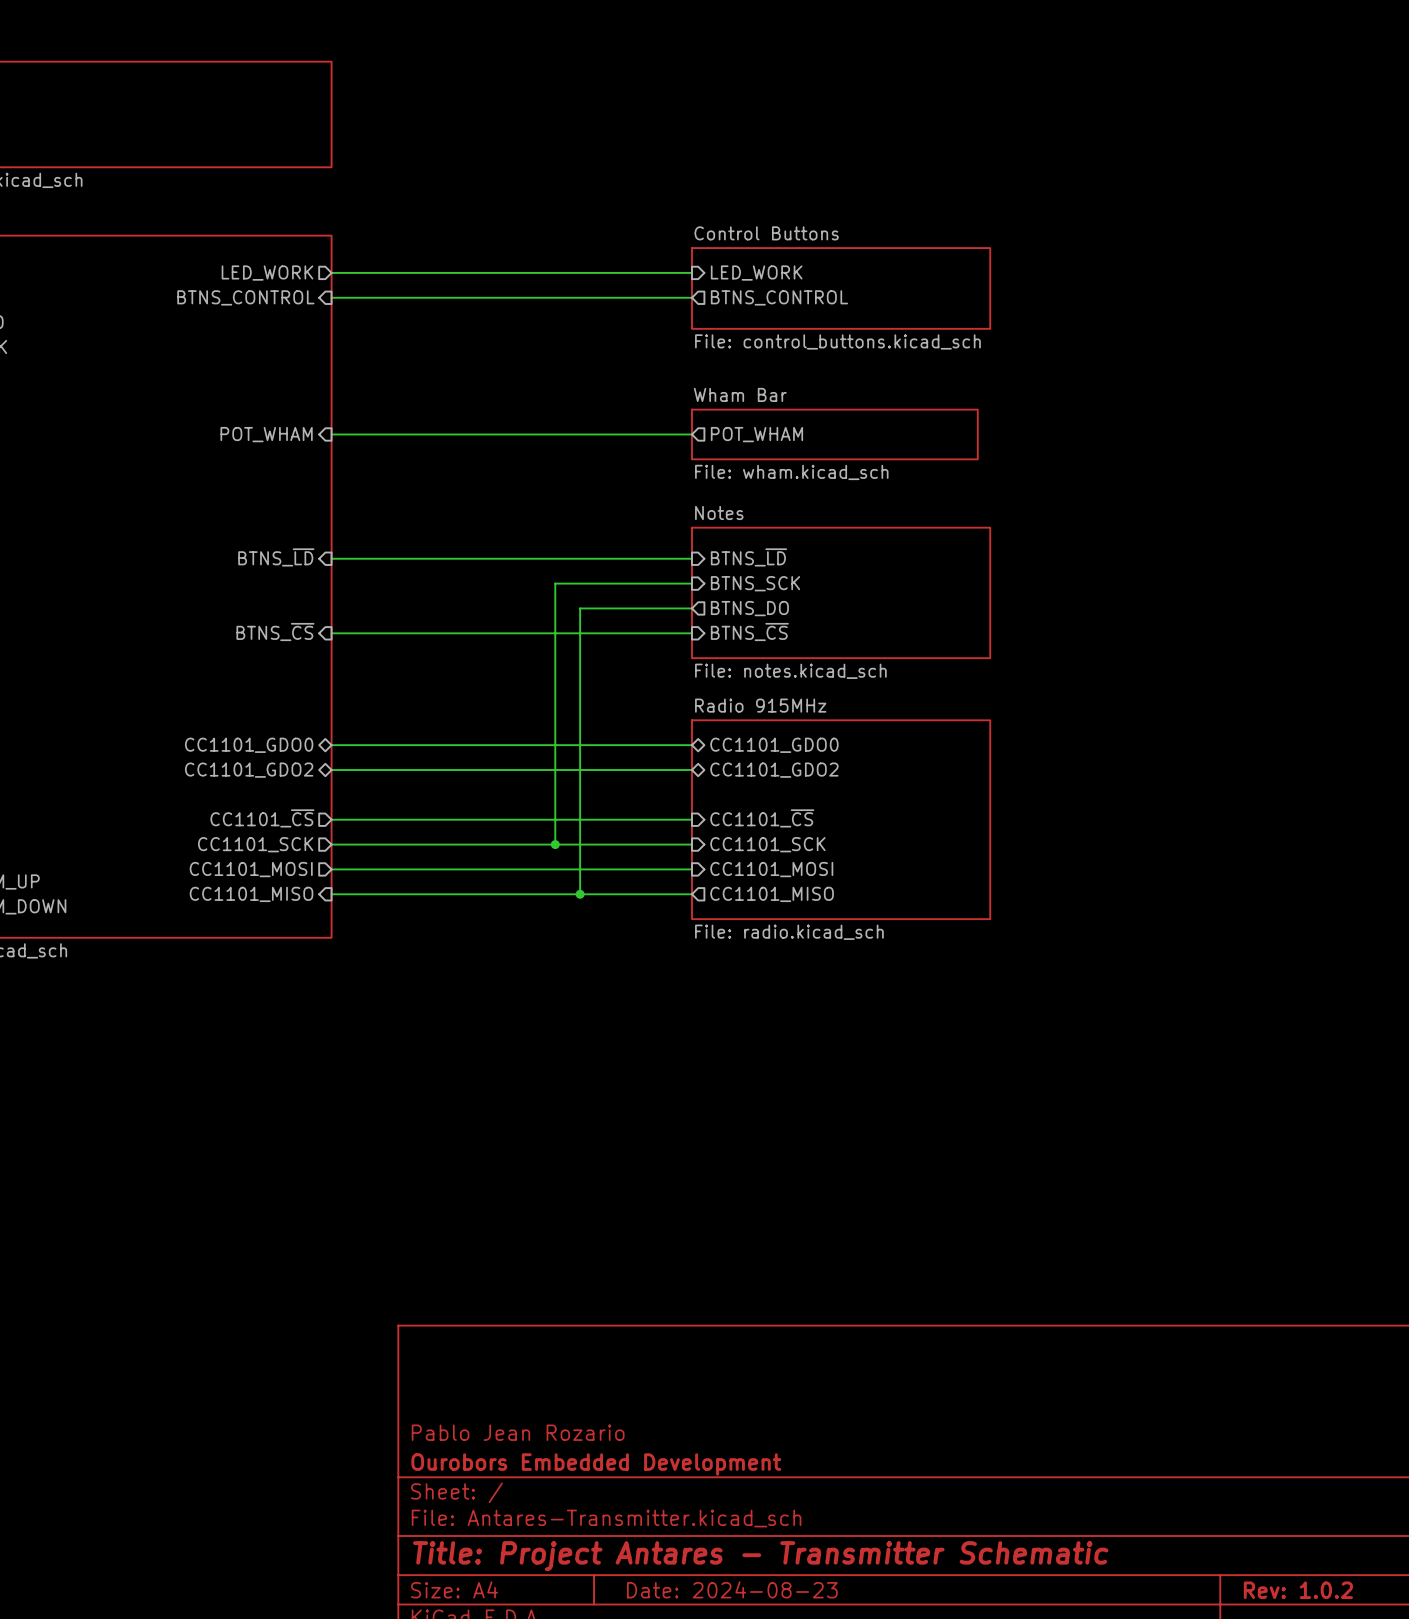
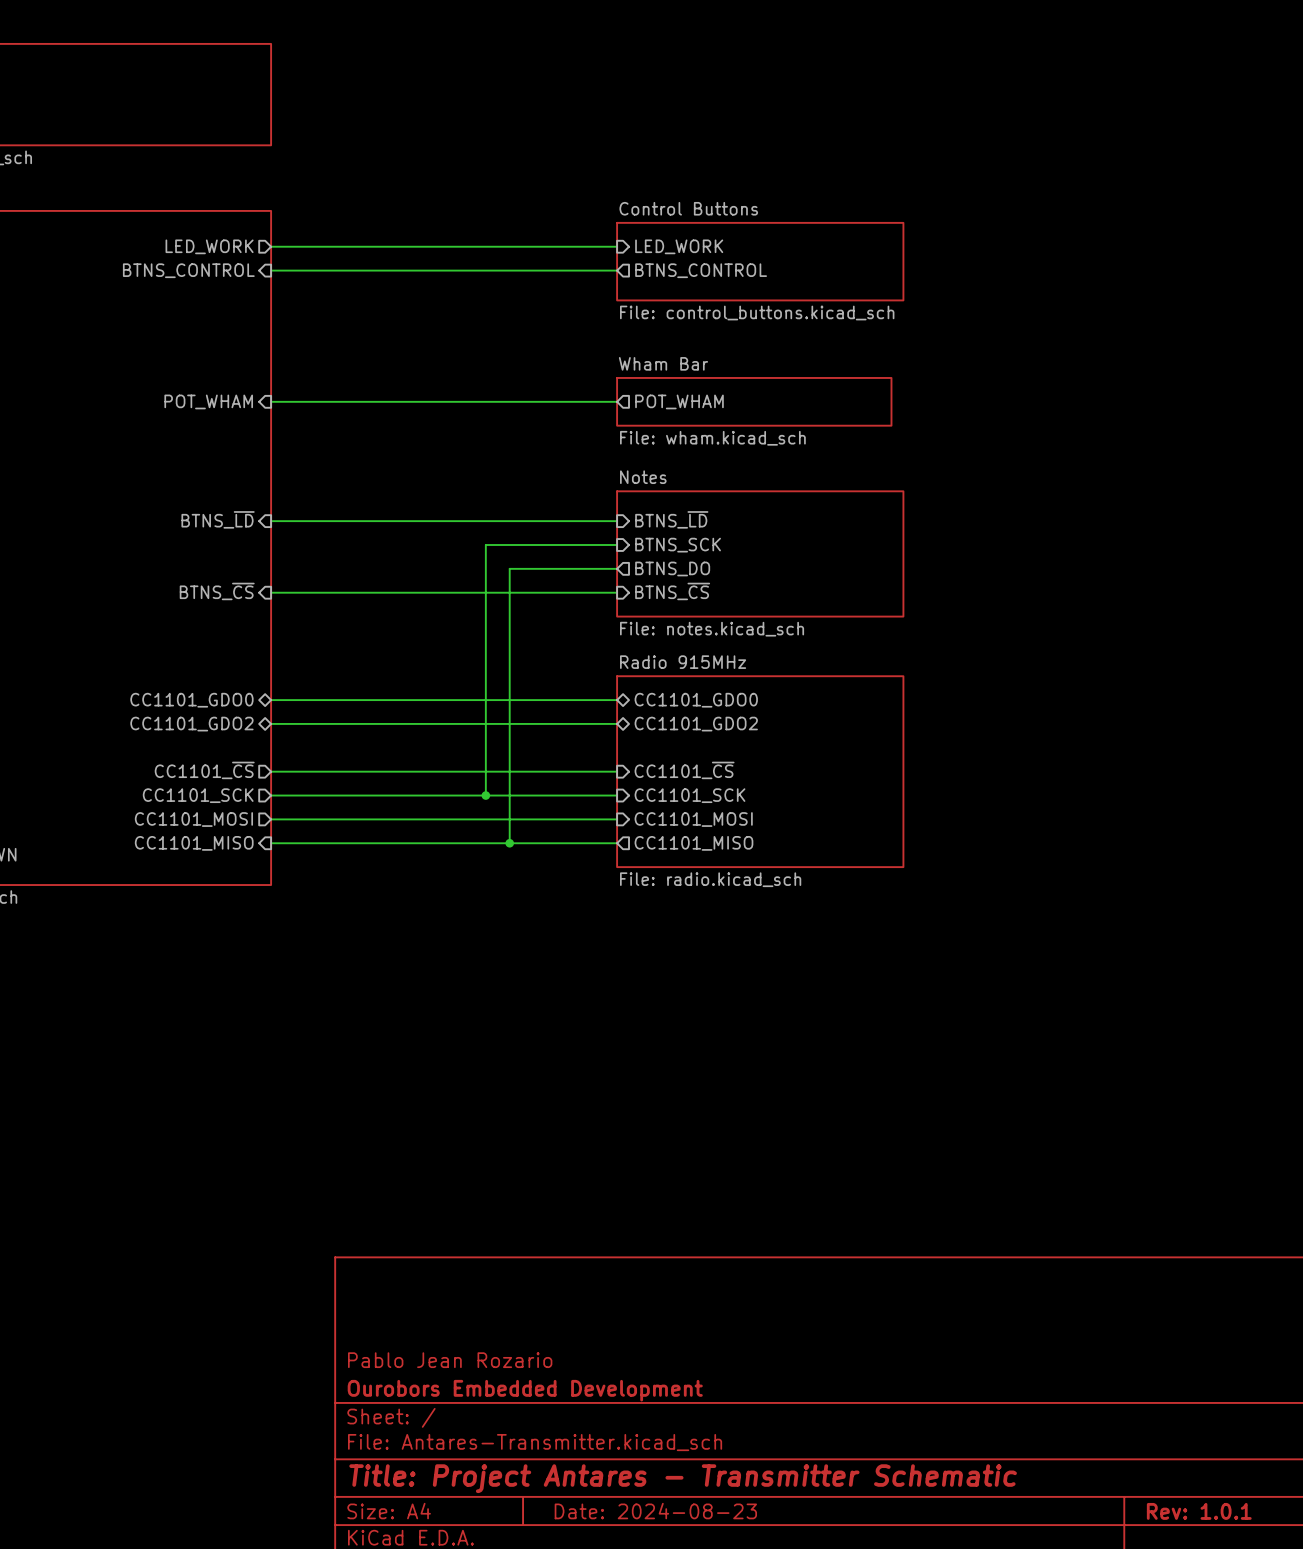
title block: Rev: 1.0.2 (1298, 1590) -> Rev: 1.0.1 (1199, 1511)

